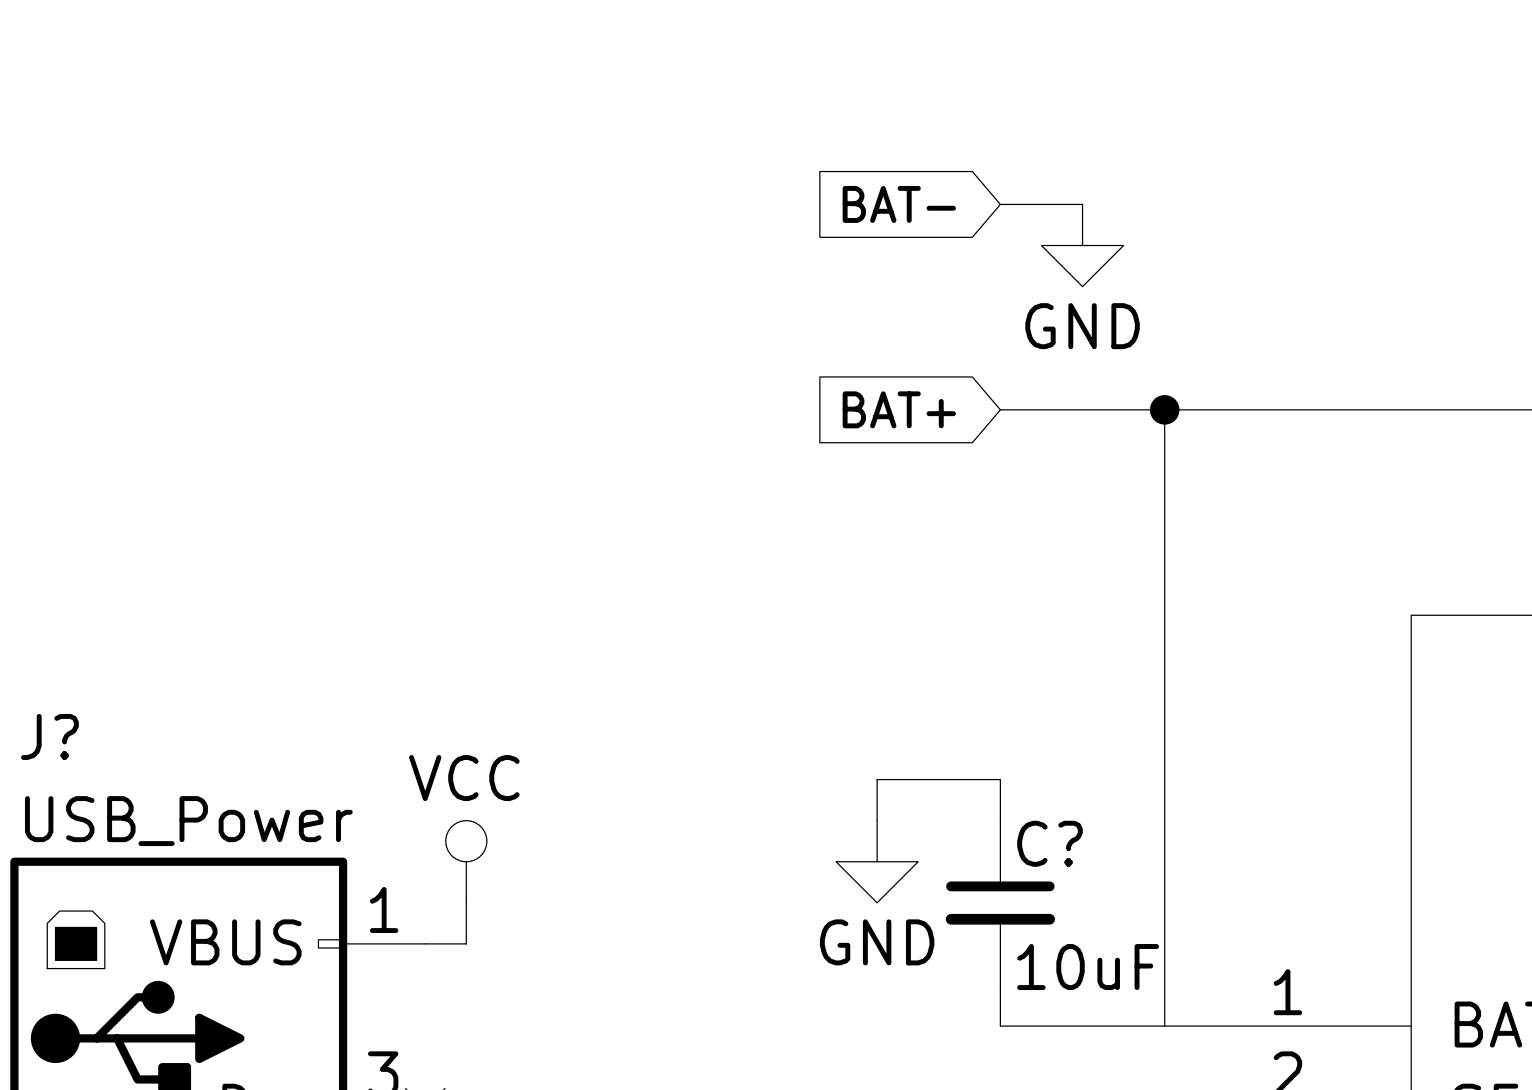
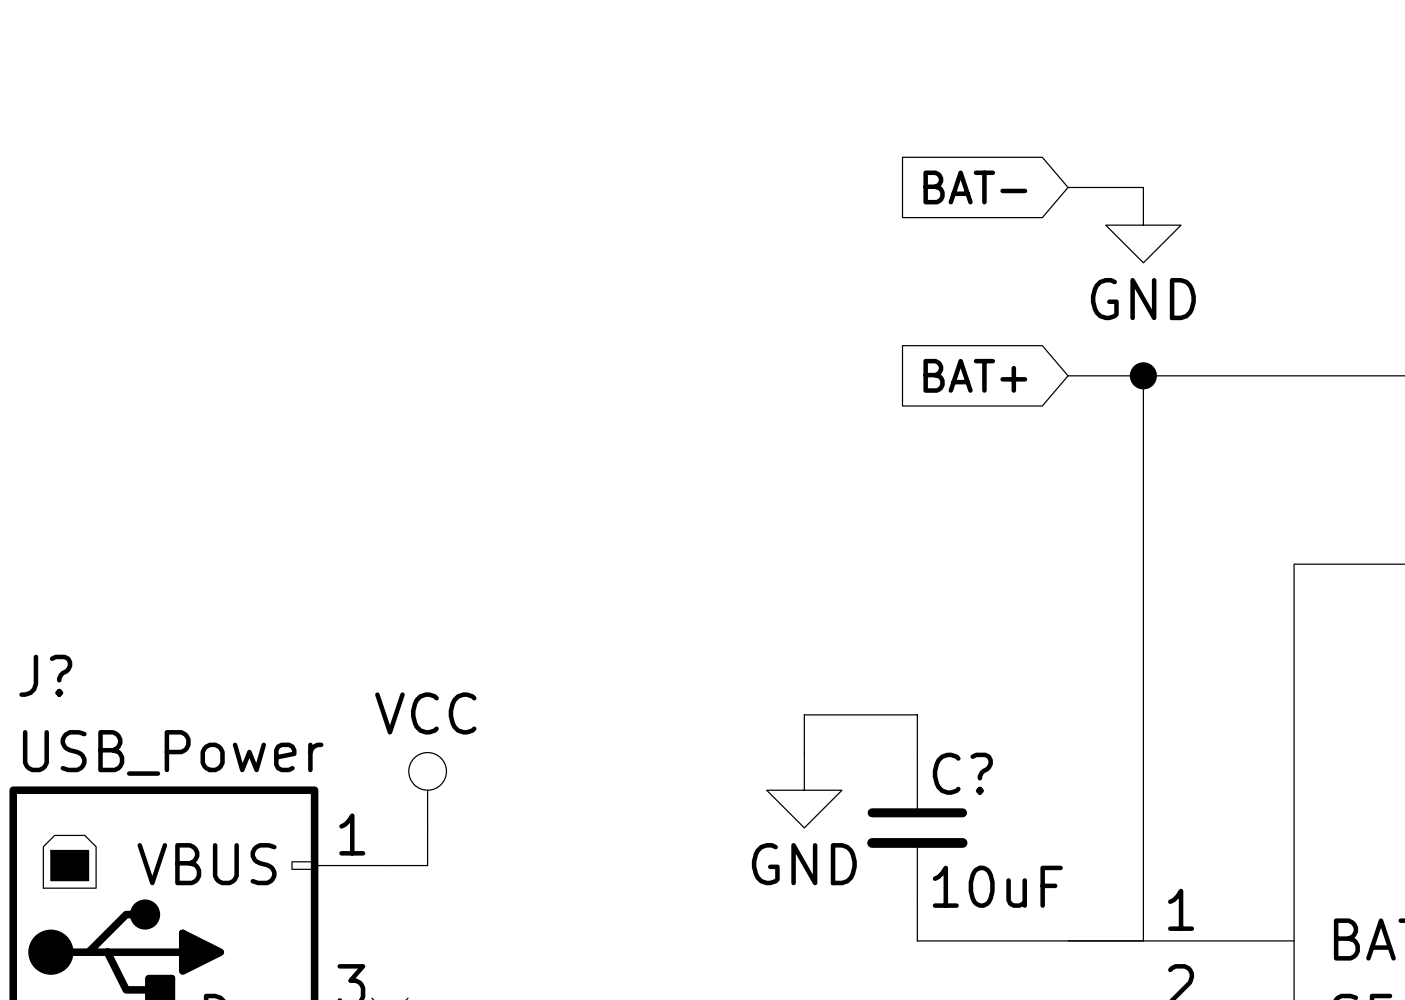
global label position: BAT- (899, 204) -> BAT- (975, 187)
wire: (1000, 204) (1082, 204) -> (1068, 187) (1143, 187)
power symbol position: GND (1082, 245) -> GND (1143, 225)
global label position: BAT+ (899, 409) -> BAT+ (975, 375)
wire: (1000, 409) (1164, 409) (1164, 1026) -> (1143, 375) (1143, 940) (1068, 940)
junction position: (1164, 409) -> (1143, 375)

